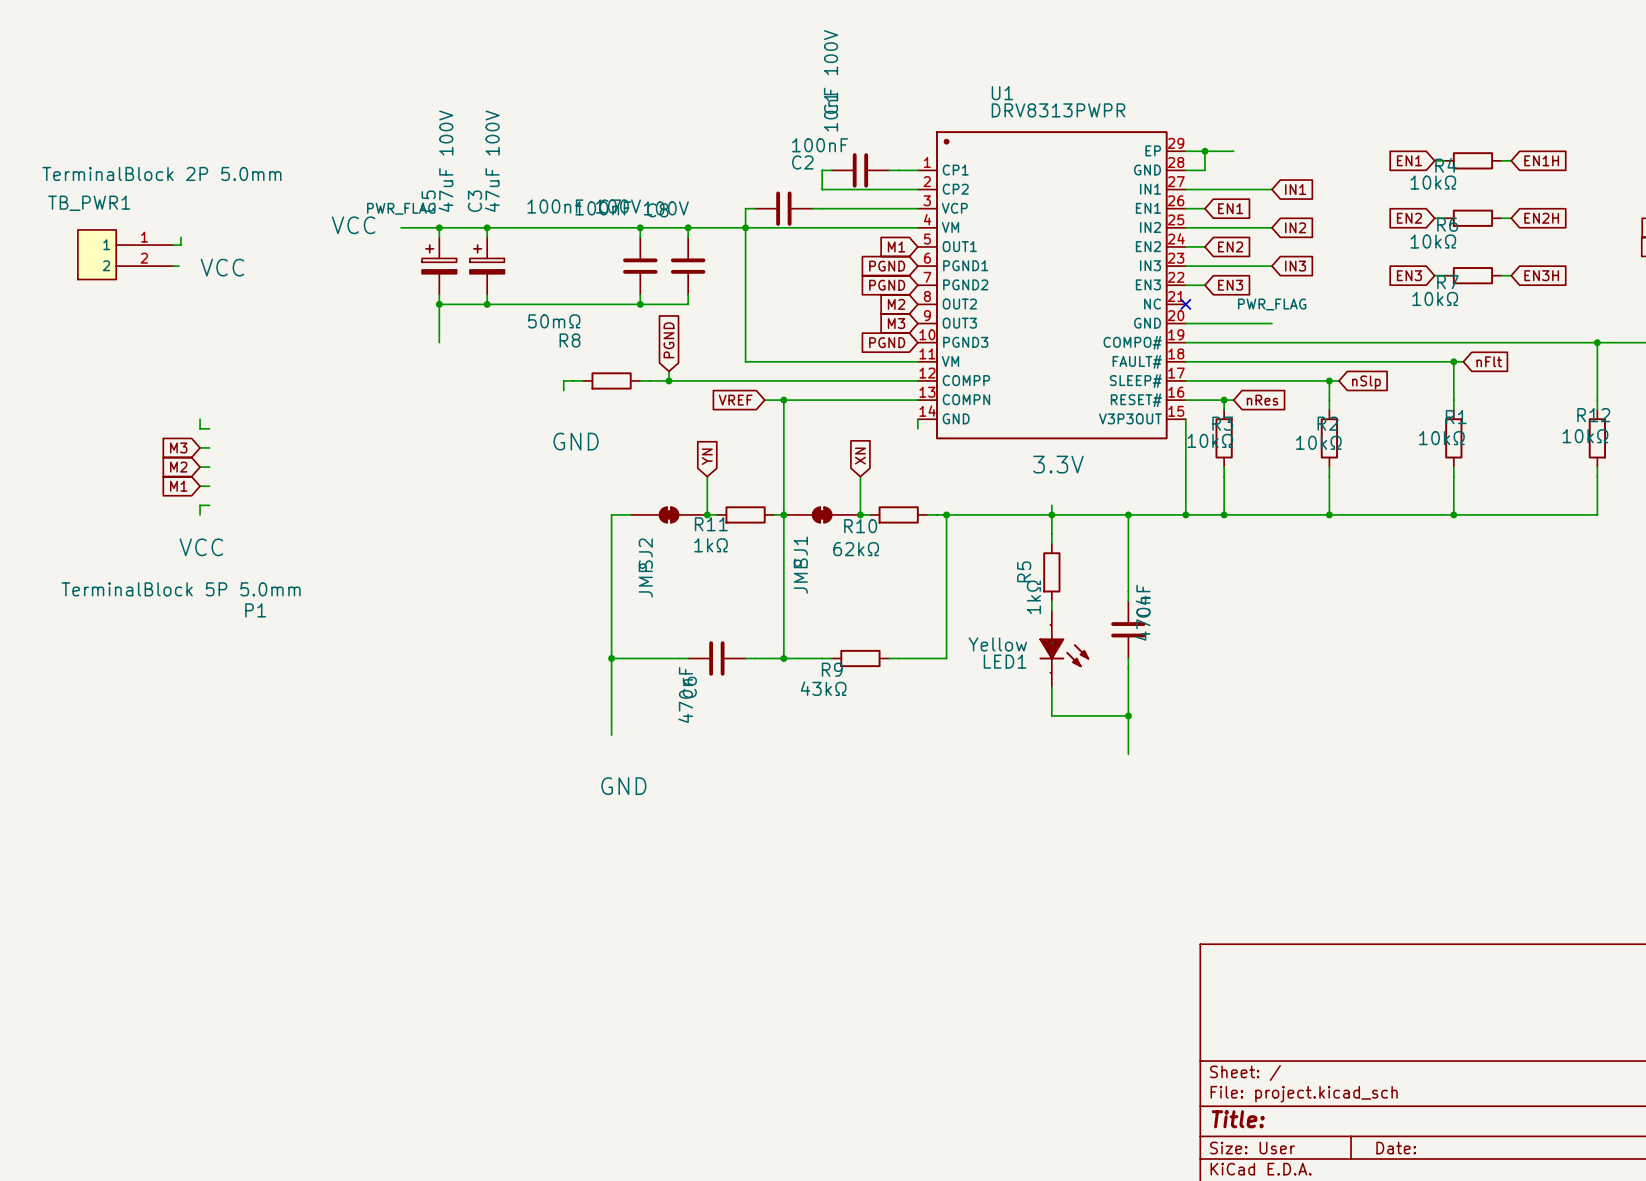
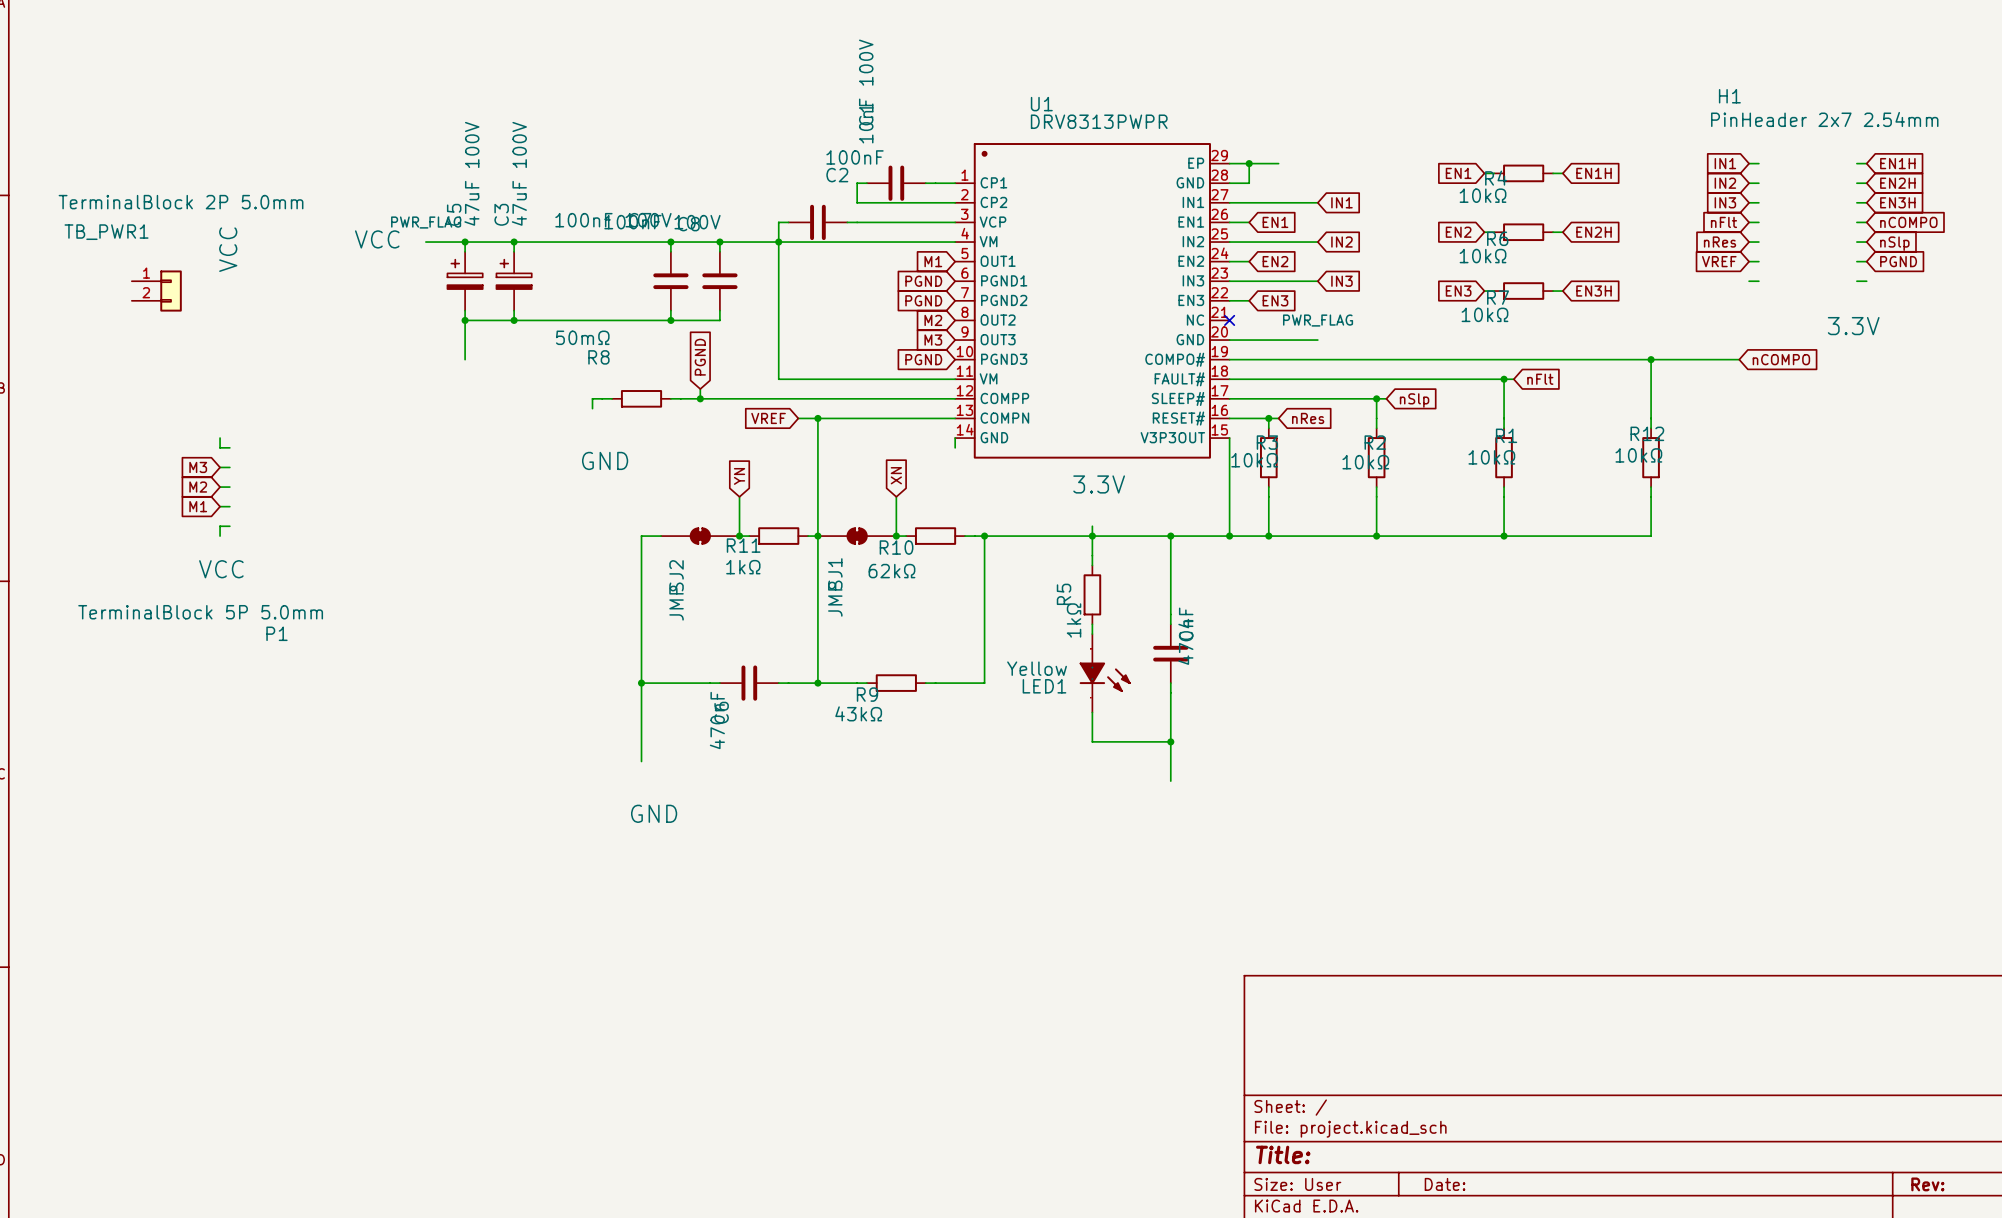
TB_PWR1 symbol: [77, 229, 174, 280] -> [131, 270, 182, 312]
wire: (180, 237) (180, 245) (173, 245) -> none
wire: (173, 266) (178, 266) -> none
power symbol position: VCC (222, 267) -> VCC (228, 249)
power symbol text rotation: 0° (222, 267) -> 90° counterclockwise (228, 249)

